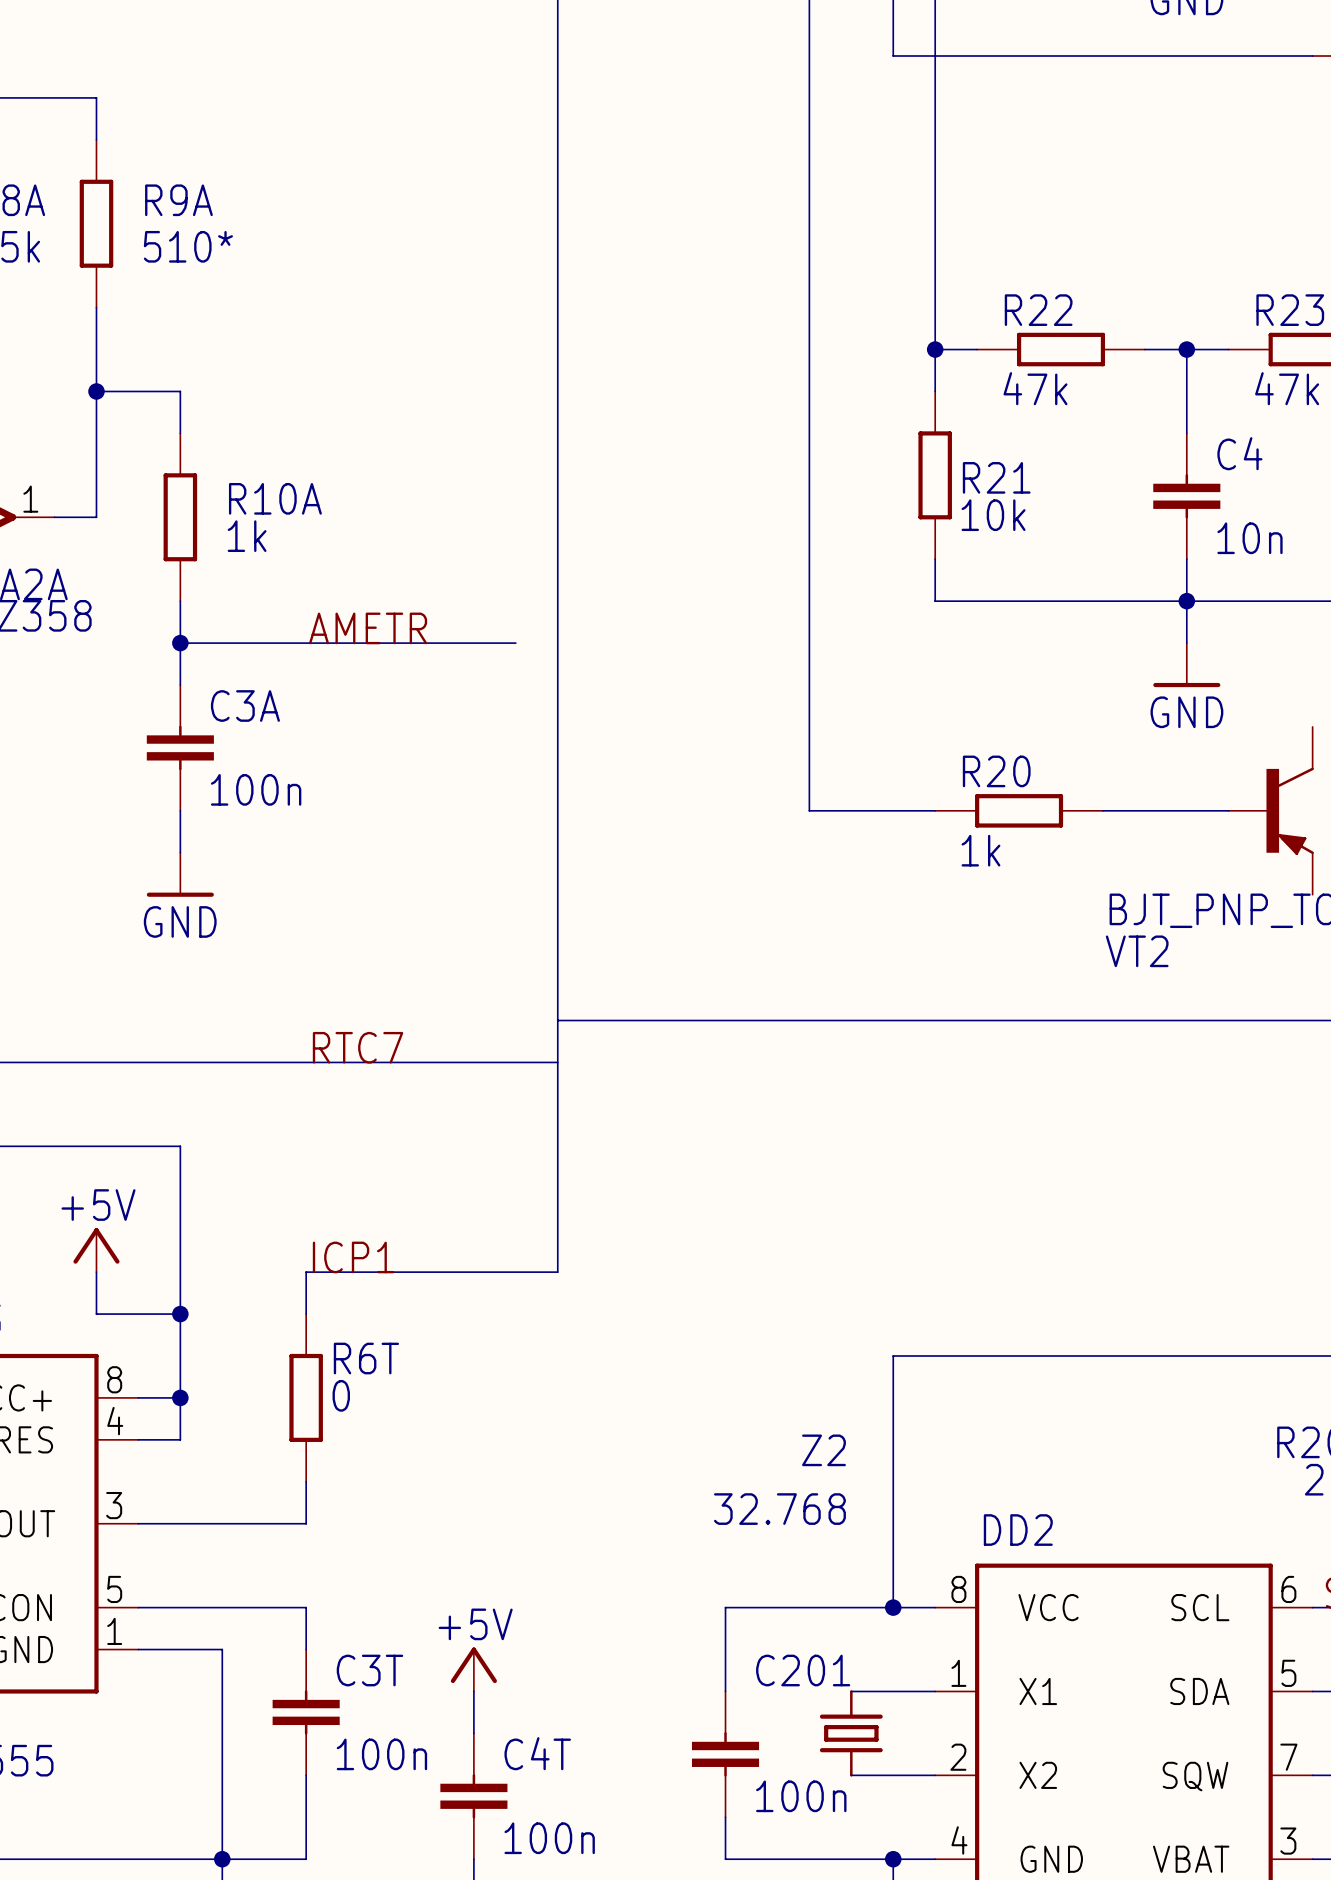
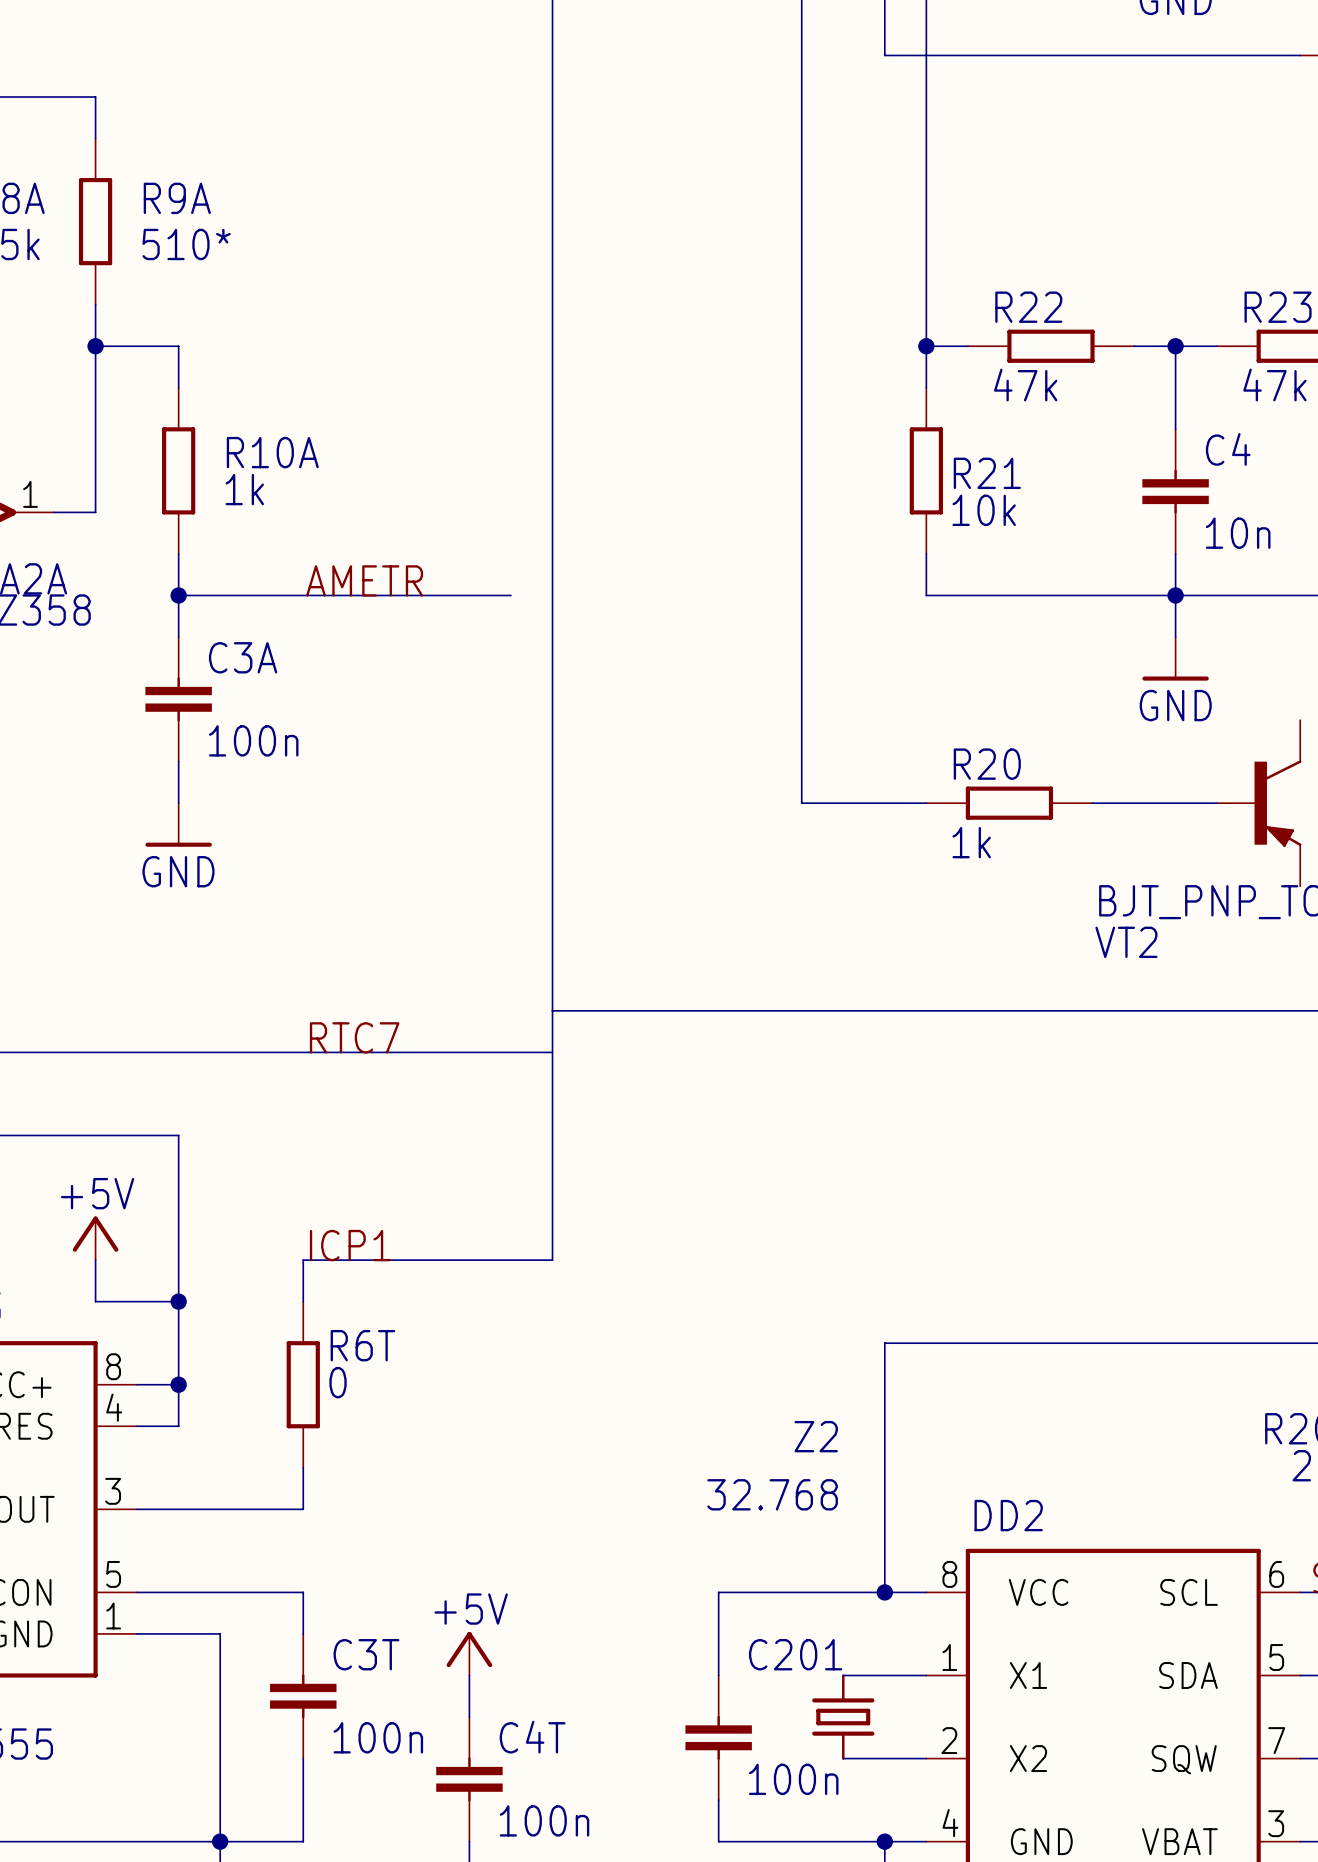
wire: (96, 391) (180, 391) (180, 433) -> (95, 346) (178, 346) (178, 387)
junction position: (96, 391) -> (95, 346)
R10A position: (180, 517) -> (178, 470)
wire: none -> (178, 553) (178, 595) (510, 595)
label position: AMETR (368, 628) -> AMETR (364, 580)
junction position: (180, 643) -> (178, 595)
wire: (515, 643) (180, 643) (180, 685) -> none
C3A position: (180, 747) -> (178, 699)
power symbol position: GND (180, 874) -> GND (178, 824)

